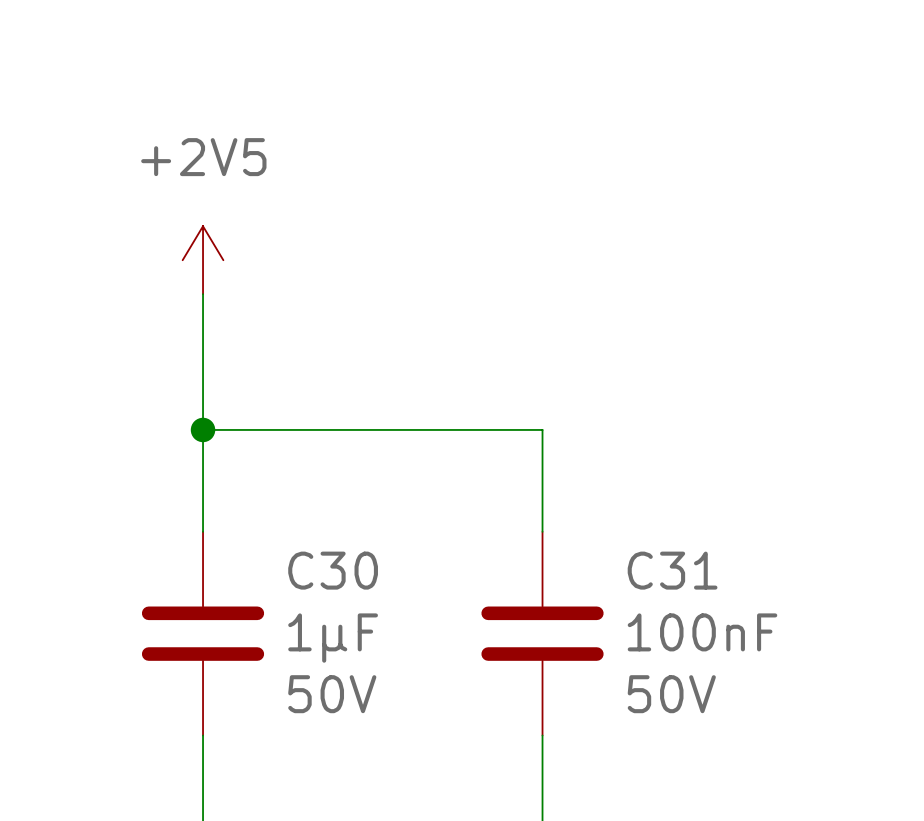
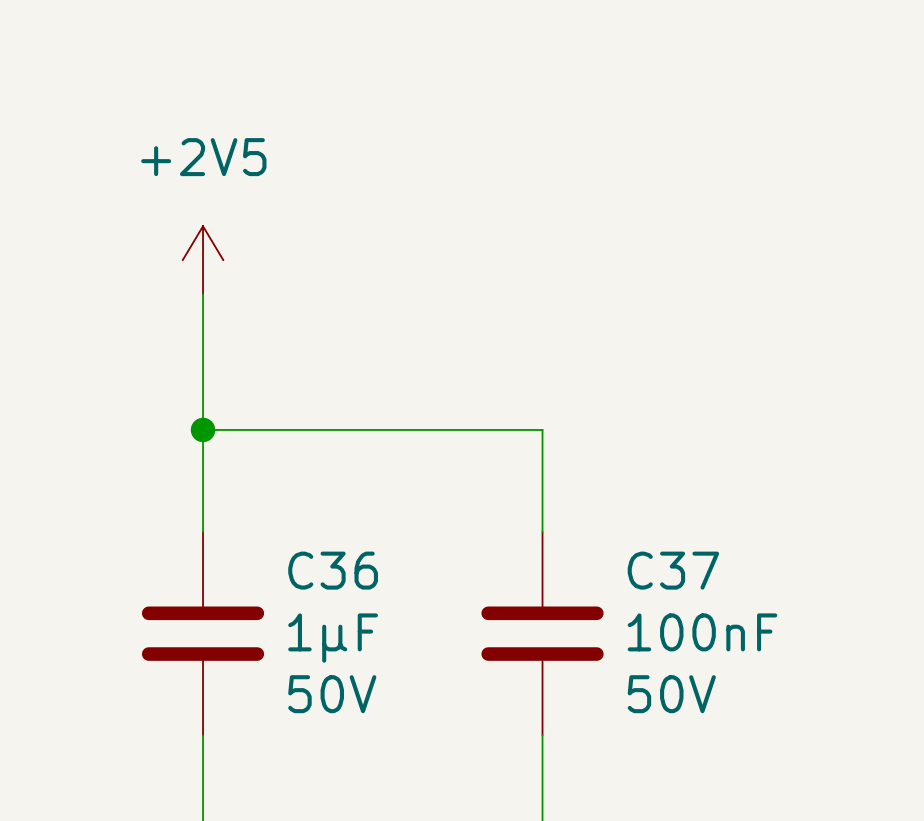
C30 name: C30 (333, 570) -> C36 (333, 570)
C31 name: C31 (672, 570) -> C37 (673, 570)

